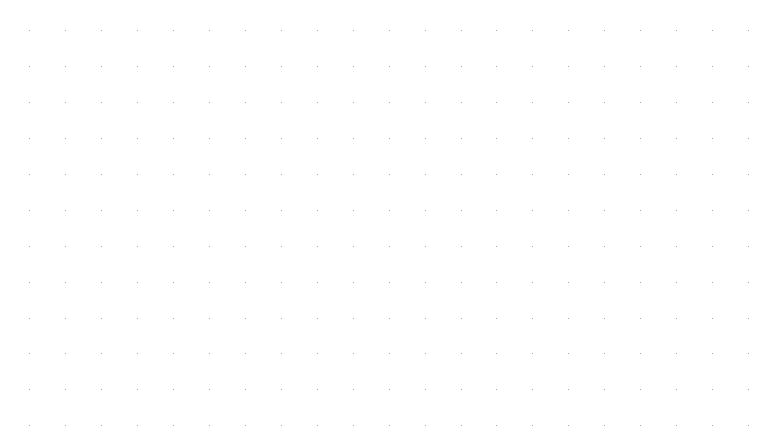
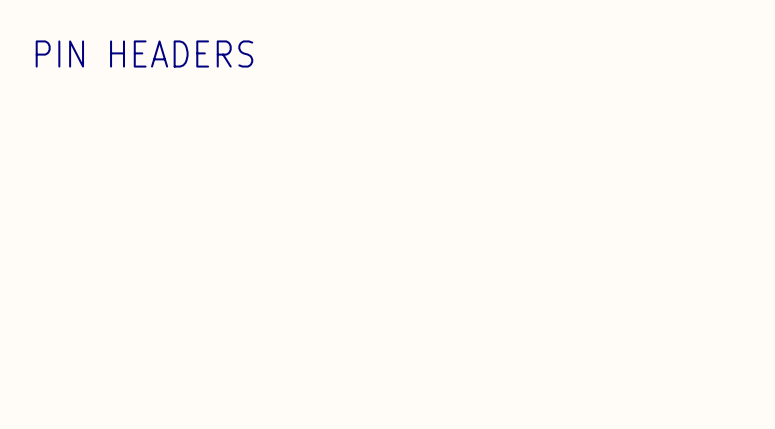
text: none -> PIN HEADERS (144, 53)

